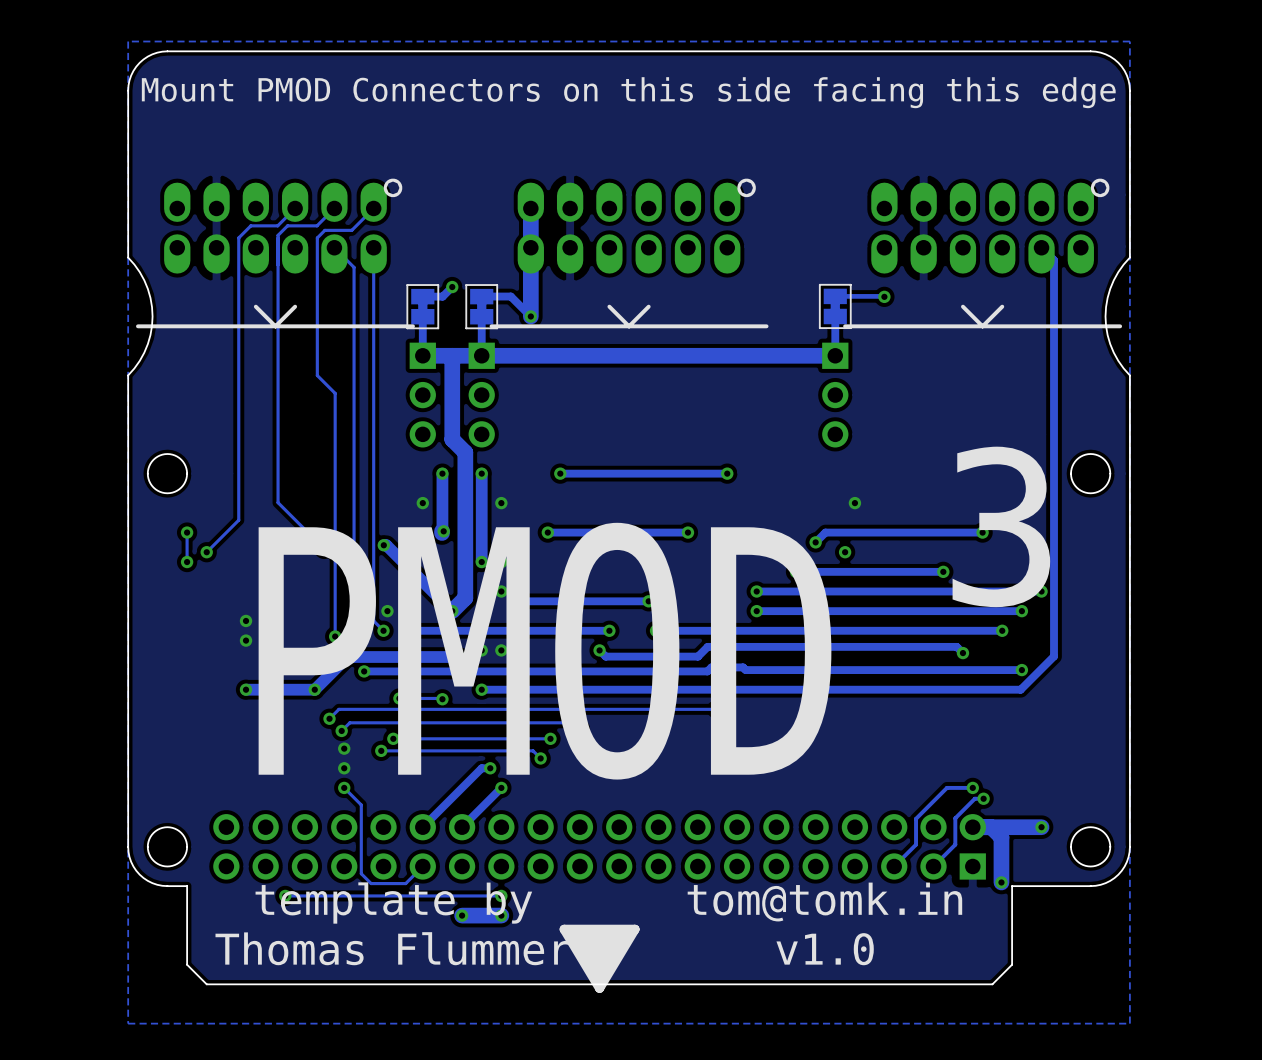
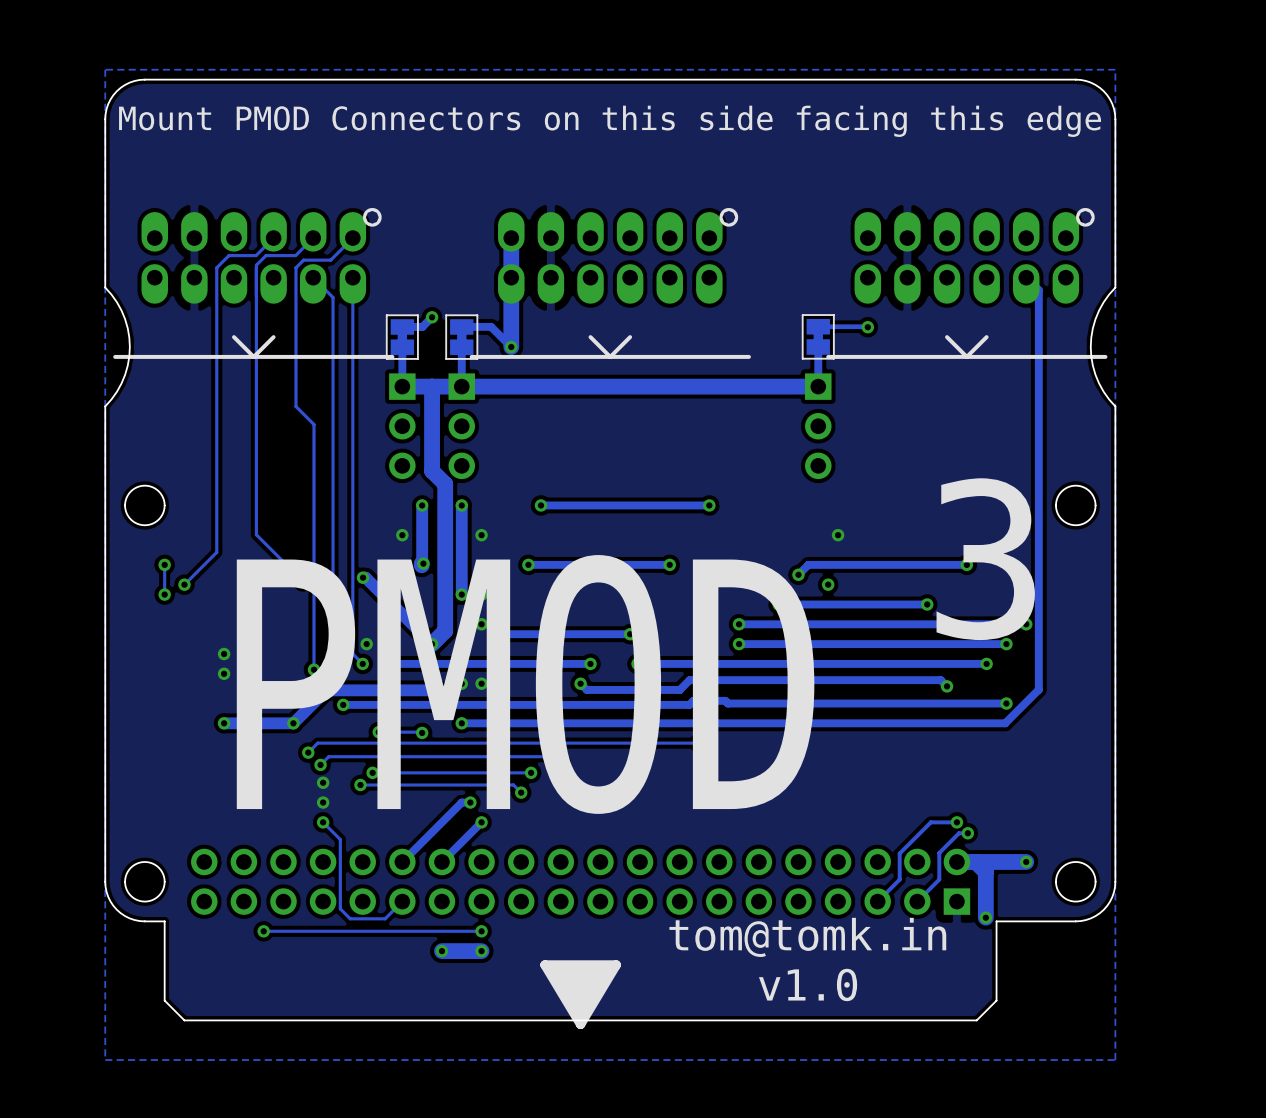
text: template by (393, 903) -> none
text: Thomas Flummer (393, 948) -> none

